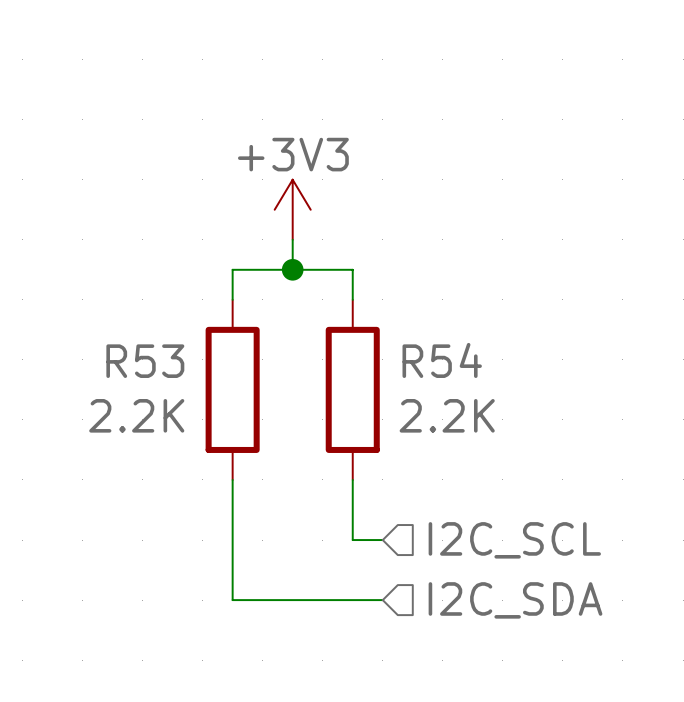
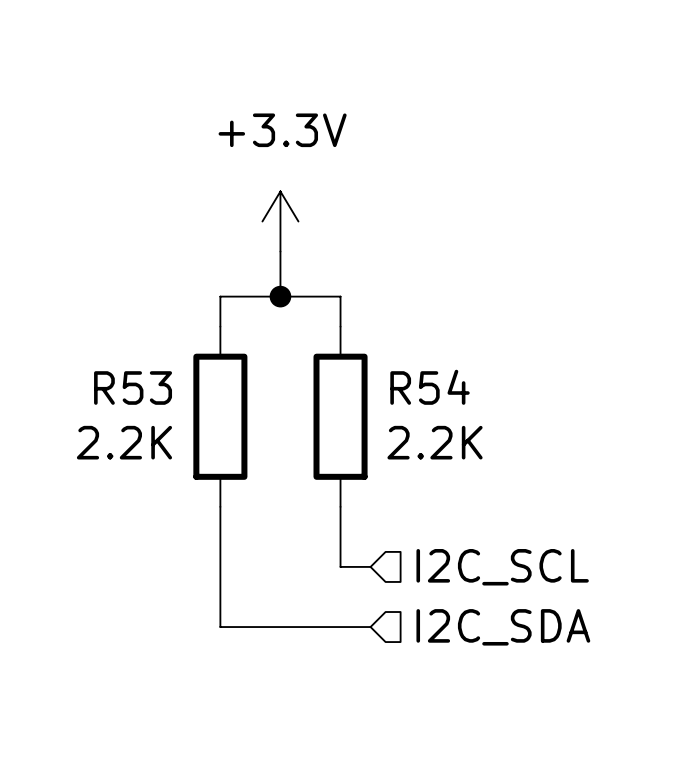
power symbol: +3V3 (292, 209) -> +3.3V (280, 221)

